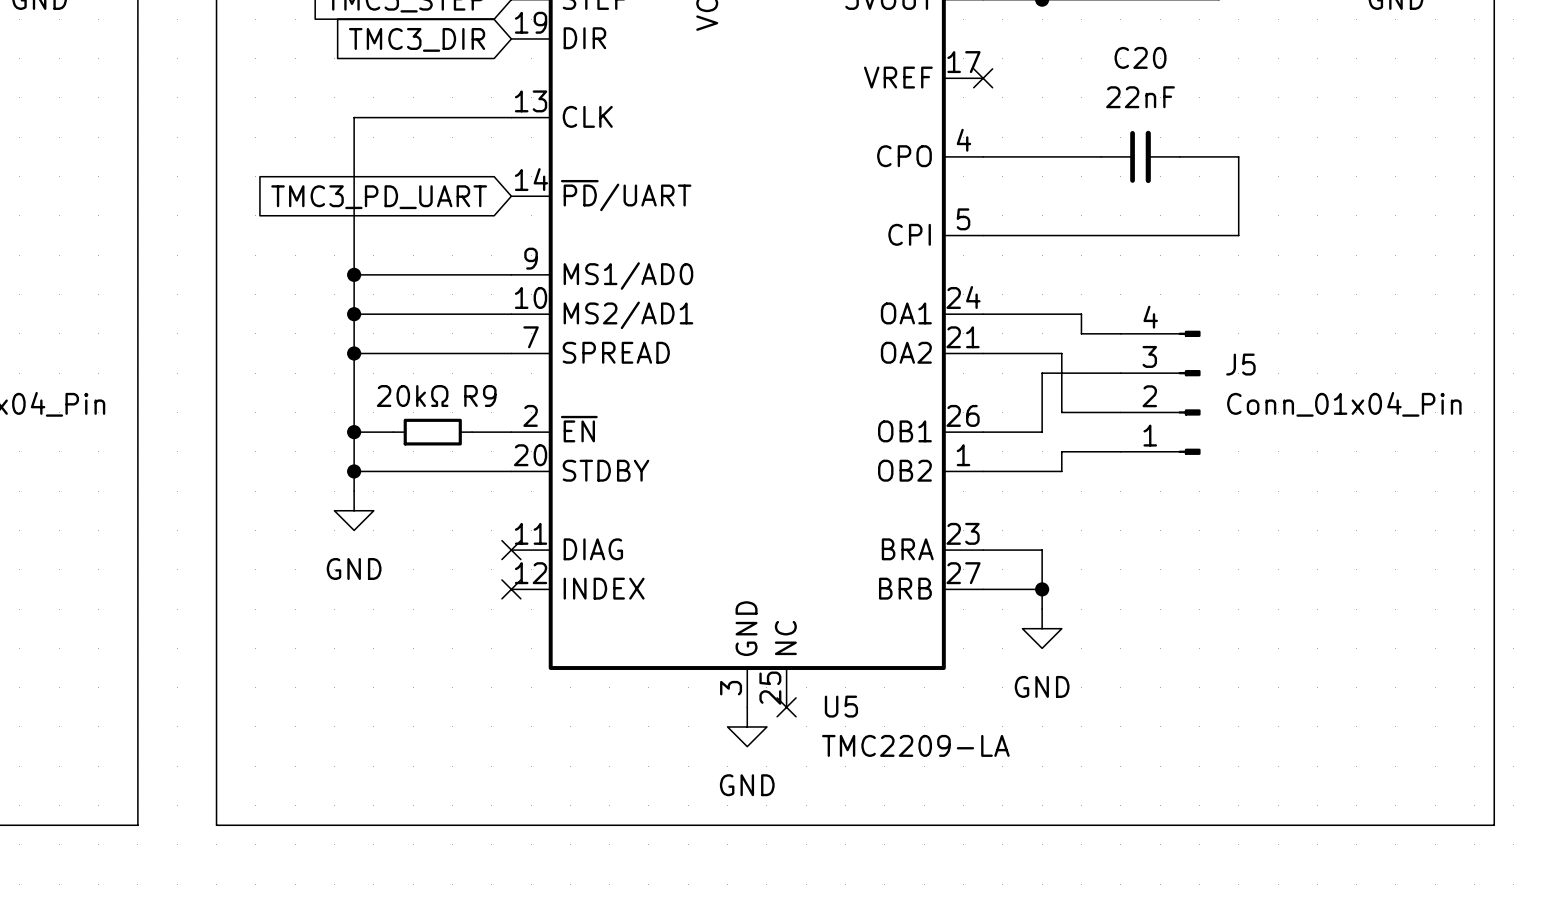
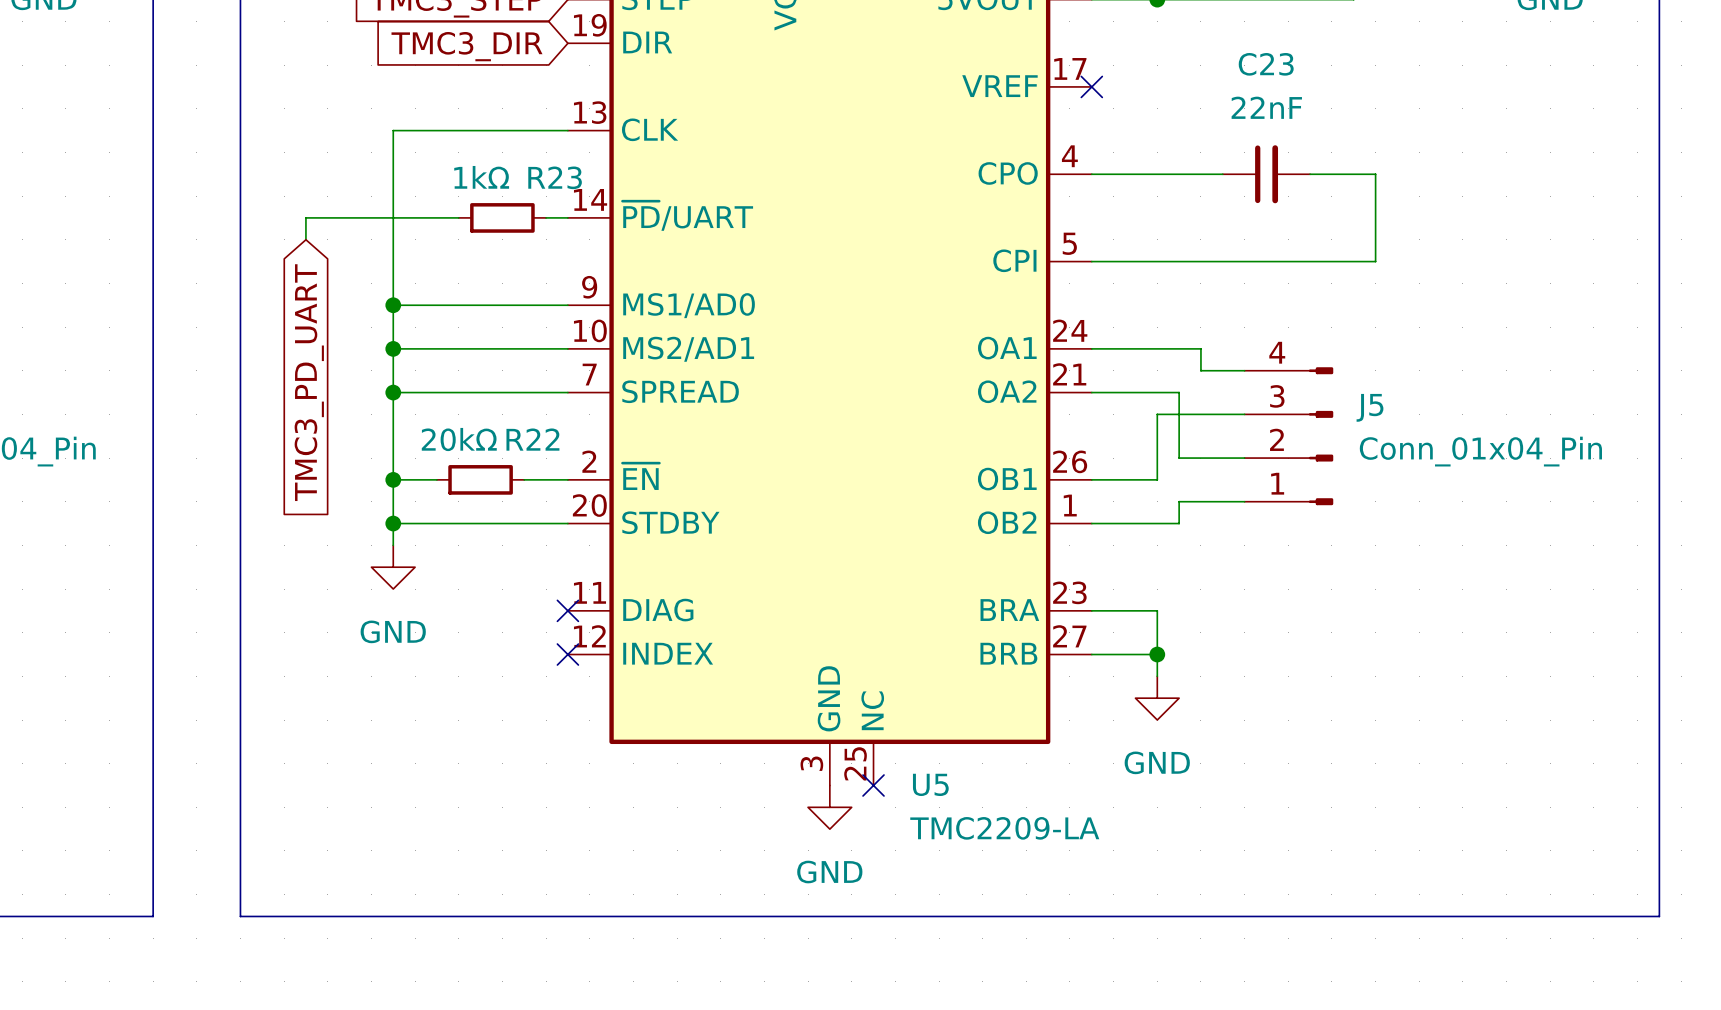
C20 name: C20 (1140, 57) -> C23 (1266, 64)
wire: none -> (458, 217) (305, 217) (305, 239)
R23: none -> 1kΩ (502, 217)
wire: none -> (546, 217) (567, 217)
global label rotation: 0° (379, 197) -> 90° counterclockwise (309, 382)
R9 name: R9 (480, 396) -> R22 (532, 439)

